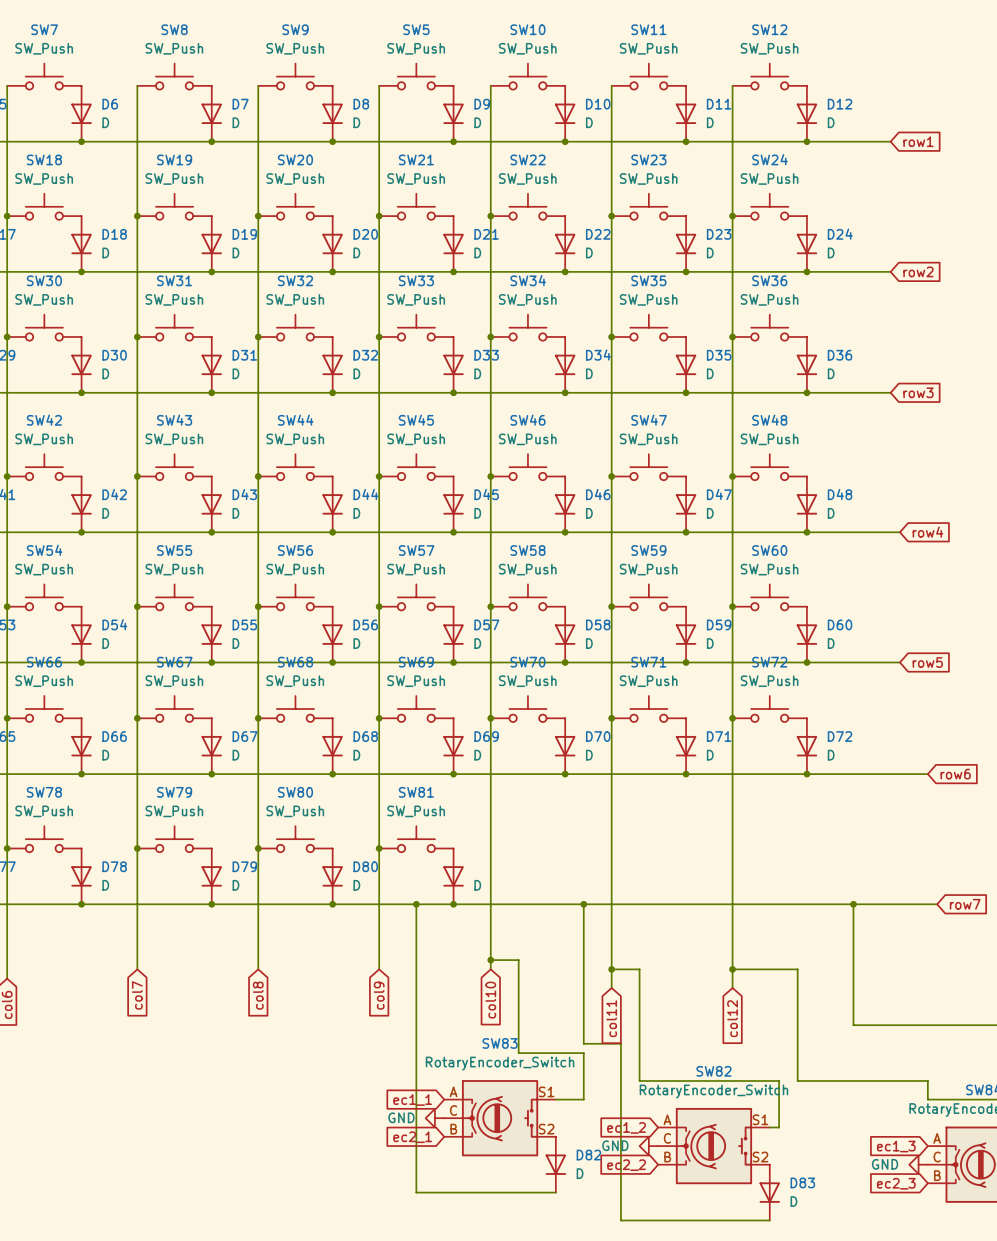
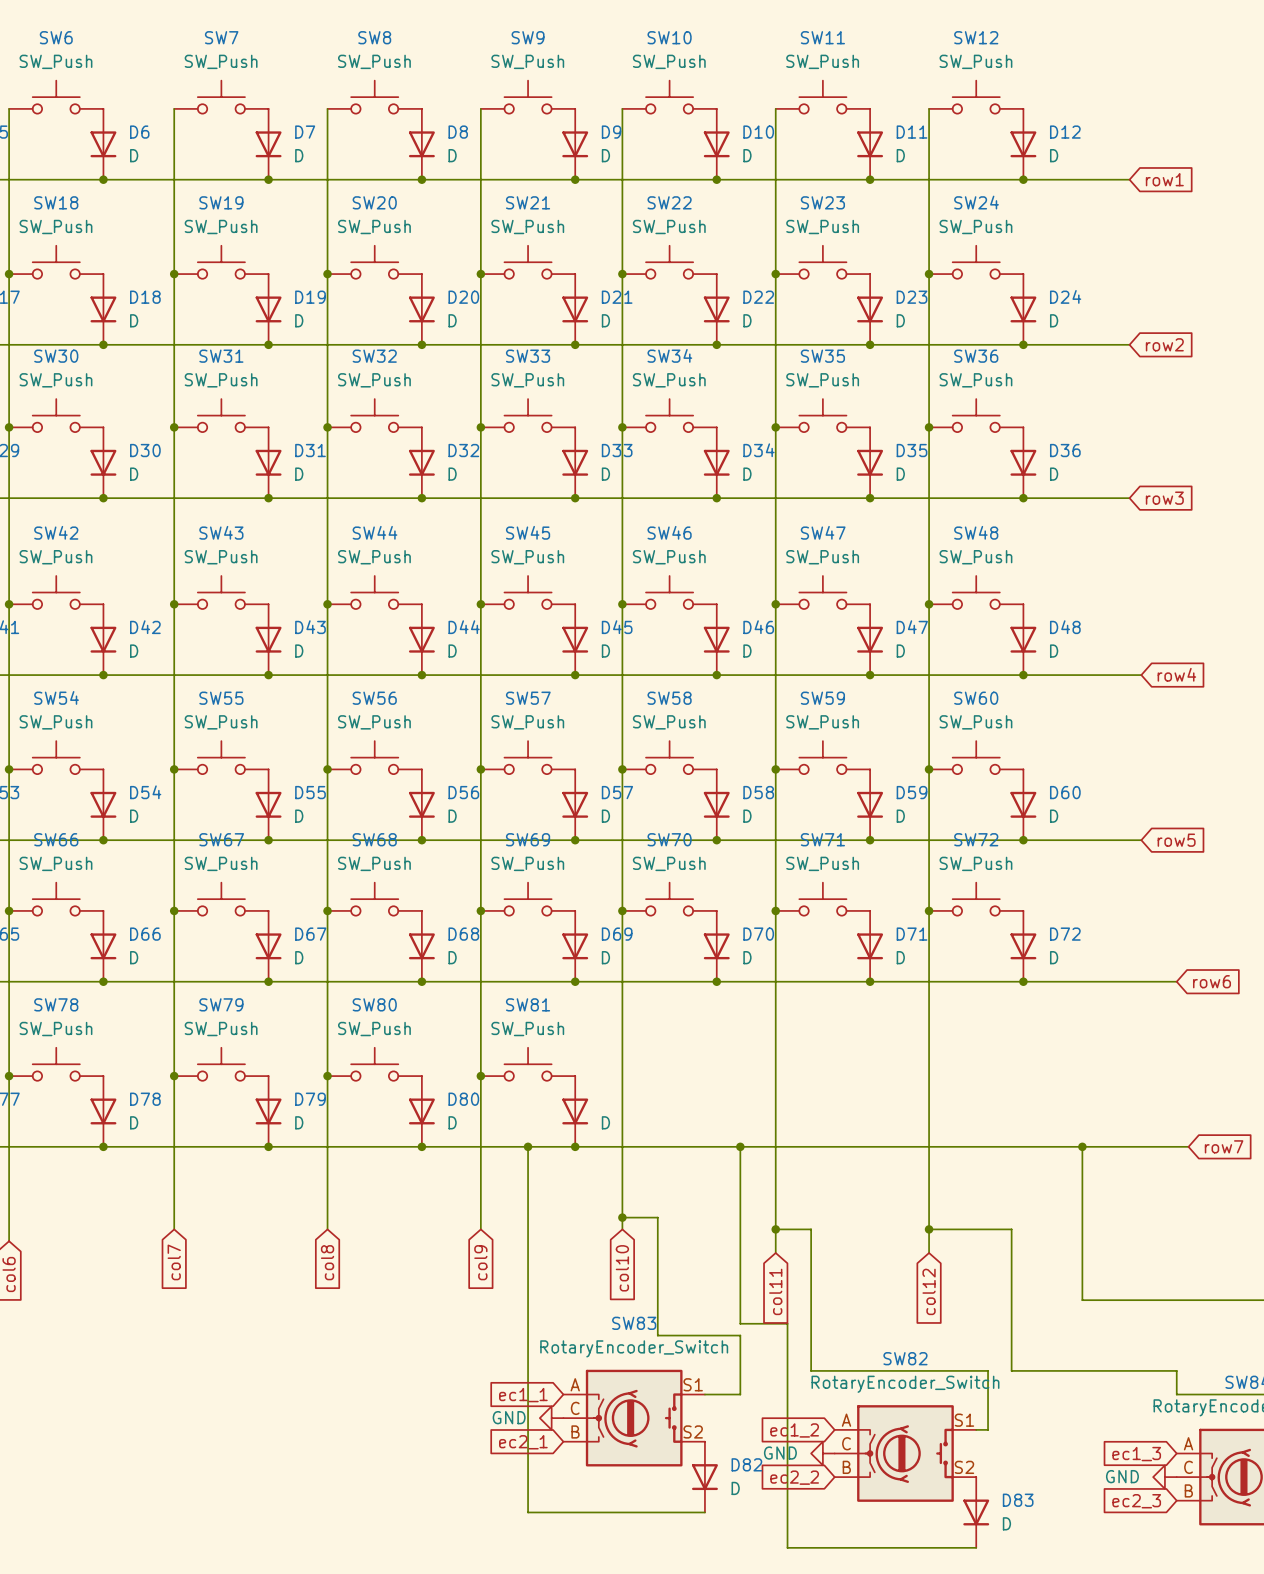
SW7 name: SW7 (44, 29) -> SW6 (56, 37)
SW8 name: SW8 (174, 29) -> SW7 (221, 37)
SW9 name: SW9 (295, 29) -> SW8 (374, 37)
SW5 name: SW5 (416, 29) -> SW9 (528, 37)

